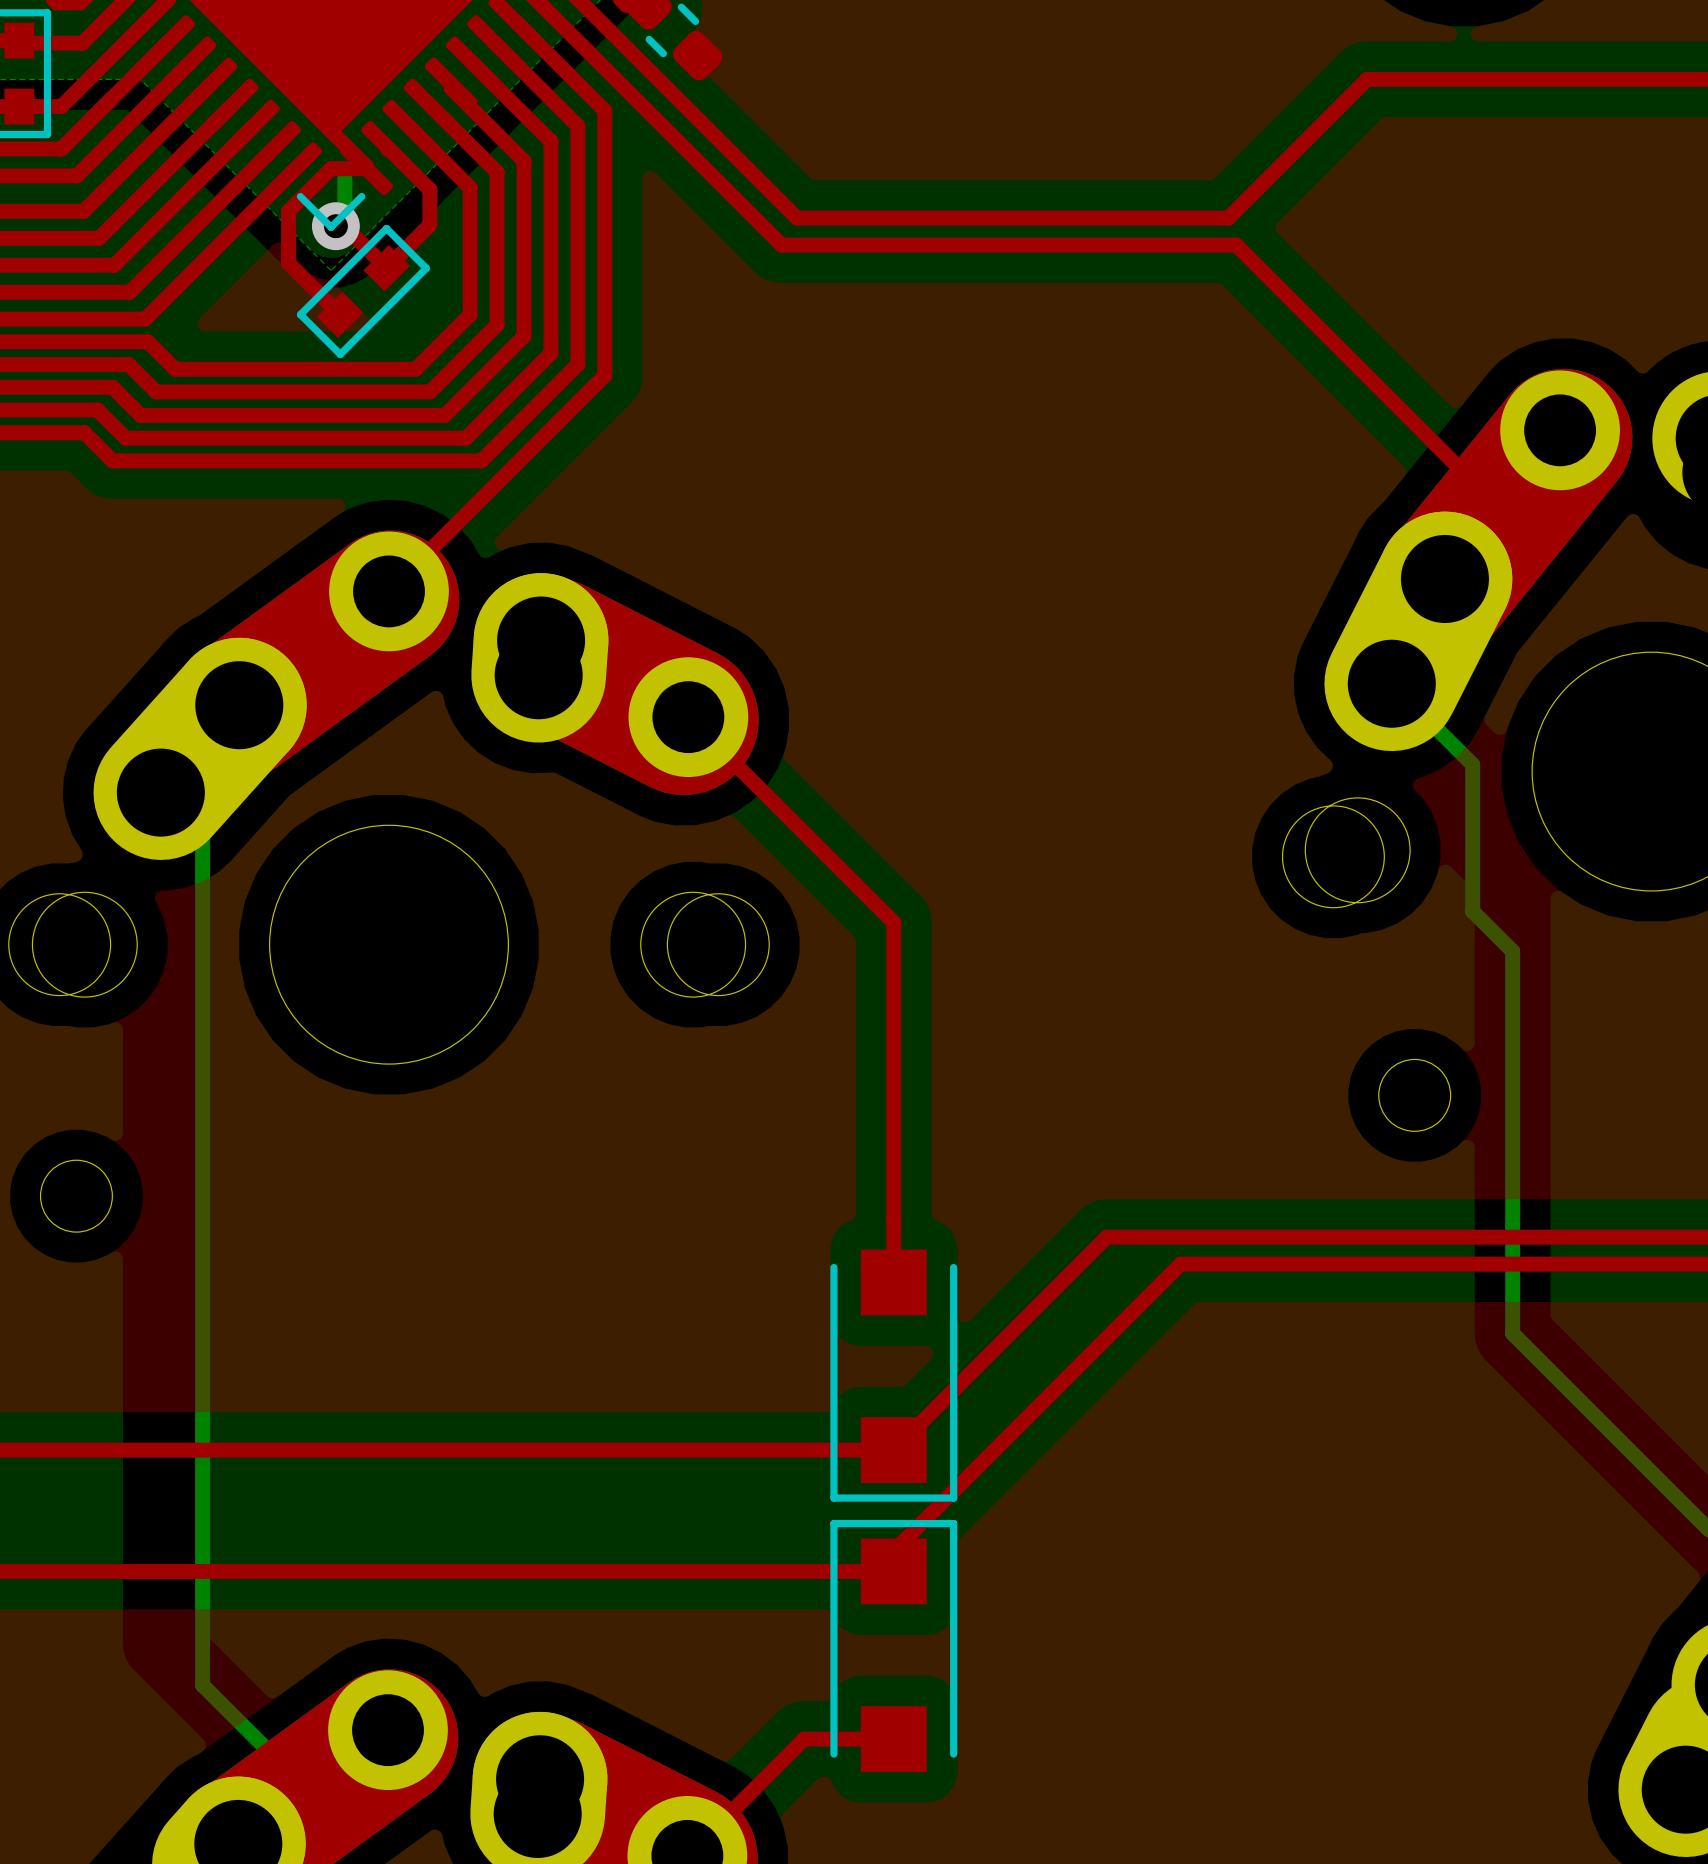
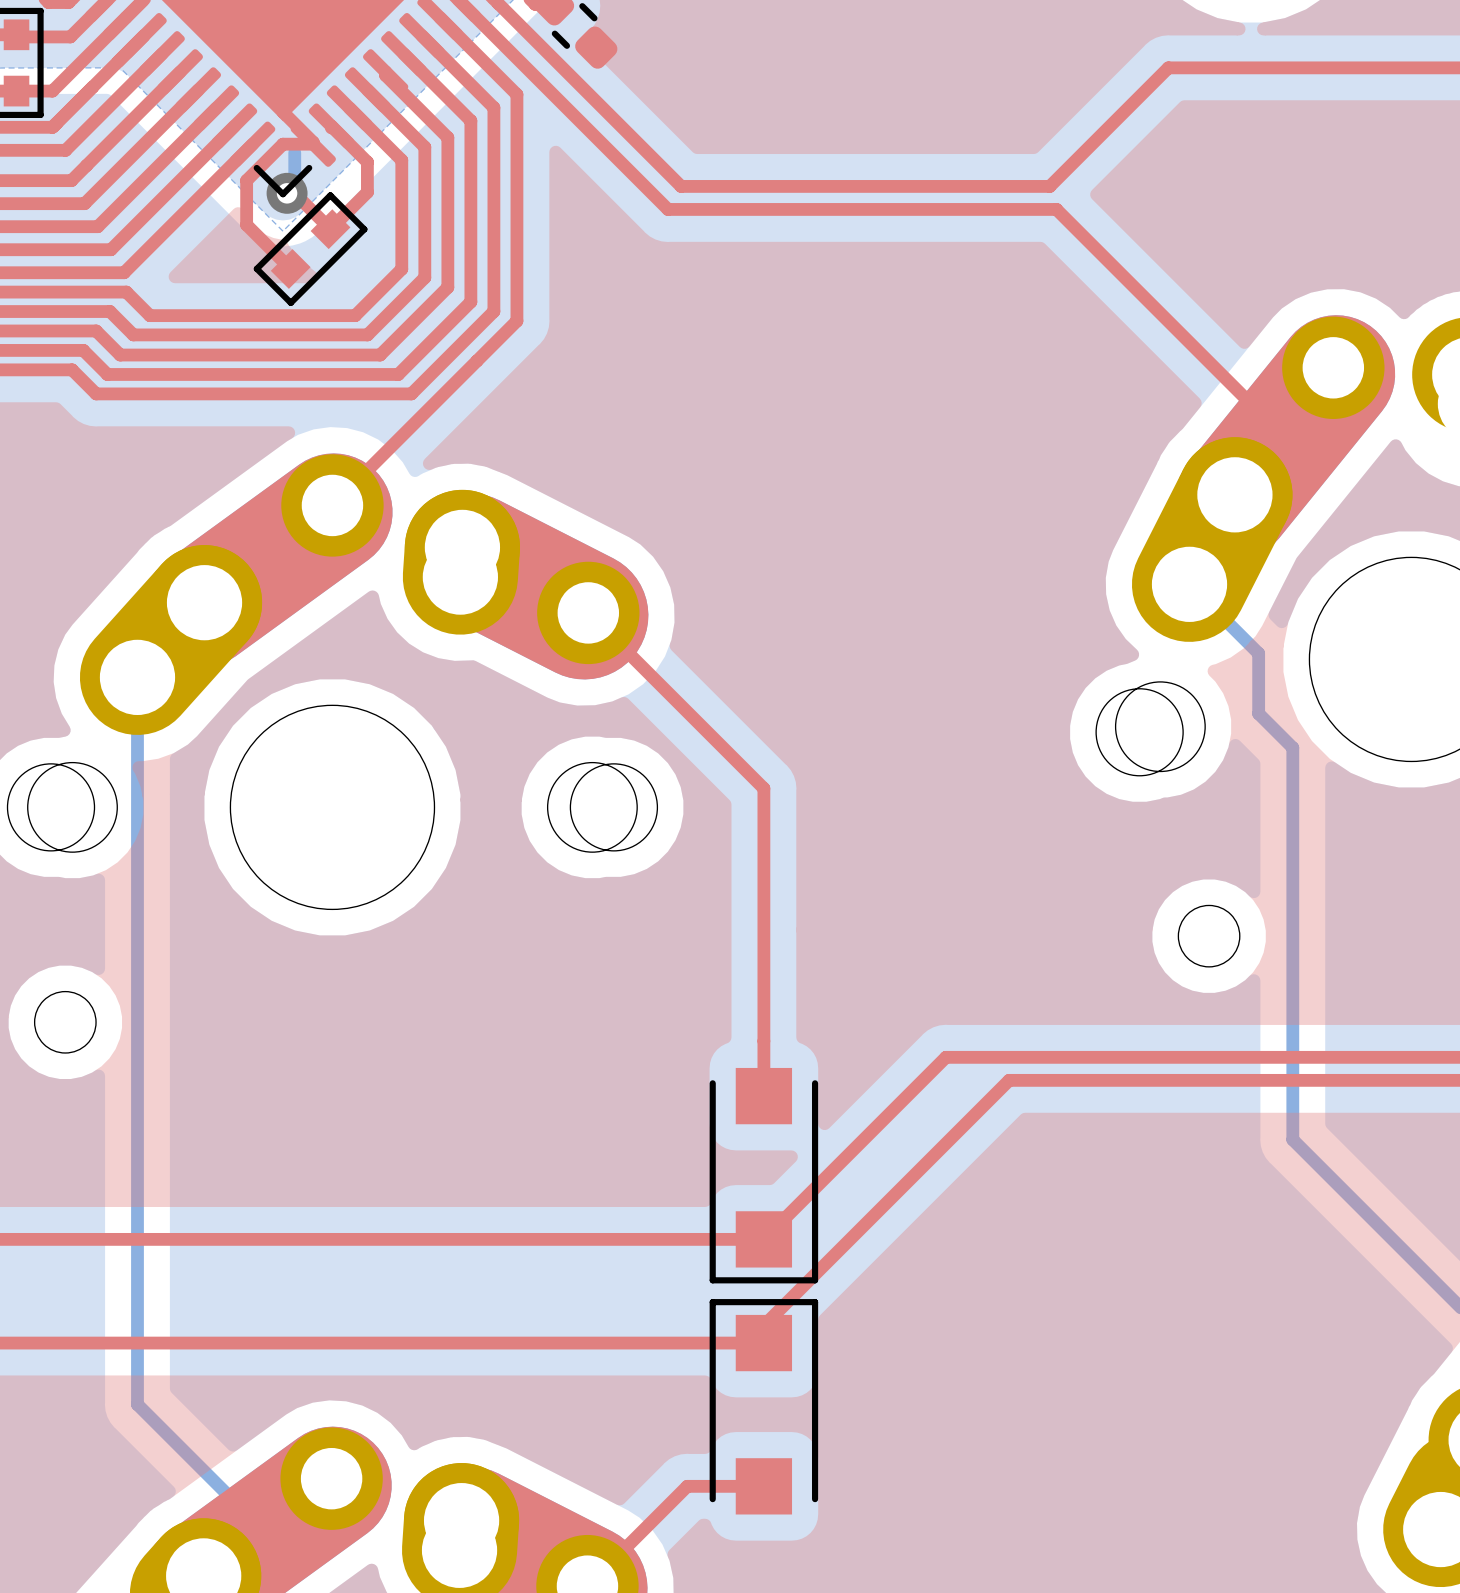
bottom track: (160, 792) (202, 834) (202, 1685) -> (137, 677) (137, 1404) (173, 1440)
bottom track: (1472, 835) (1472, 911) (1512, 951) -> (1258, 713) (1292, 747) (1292, 813)

